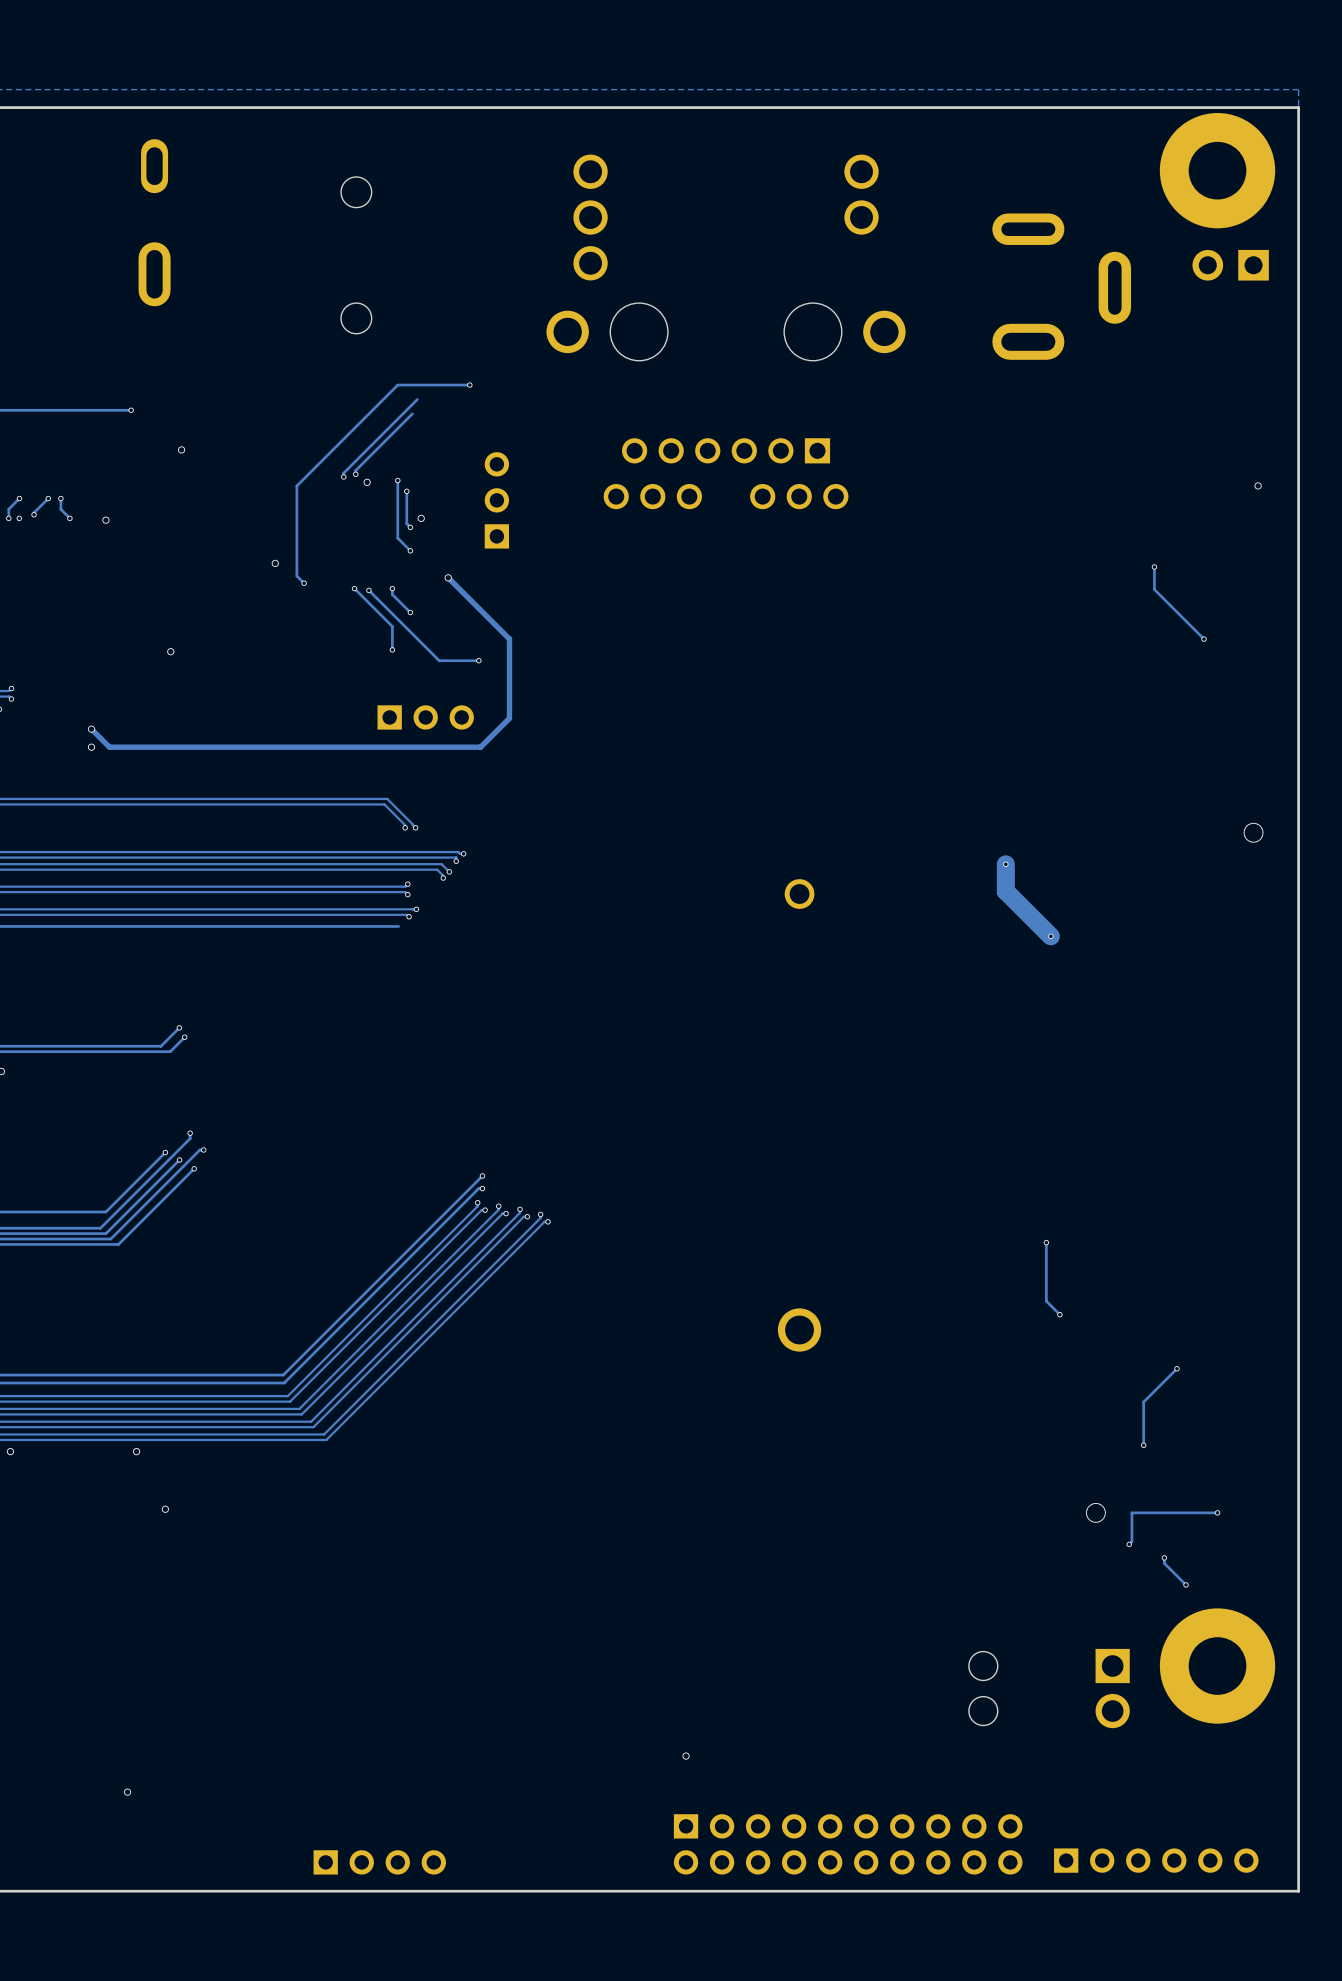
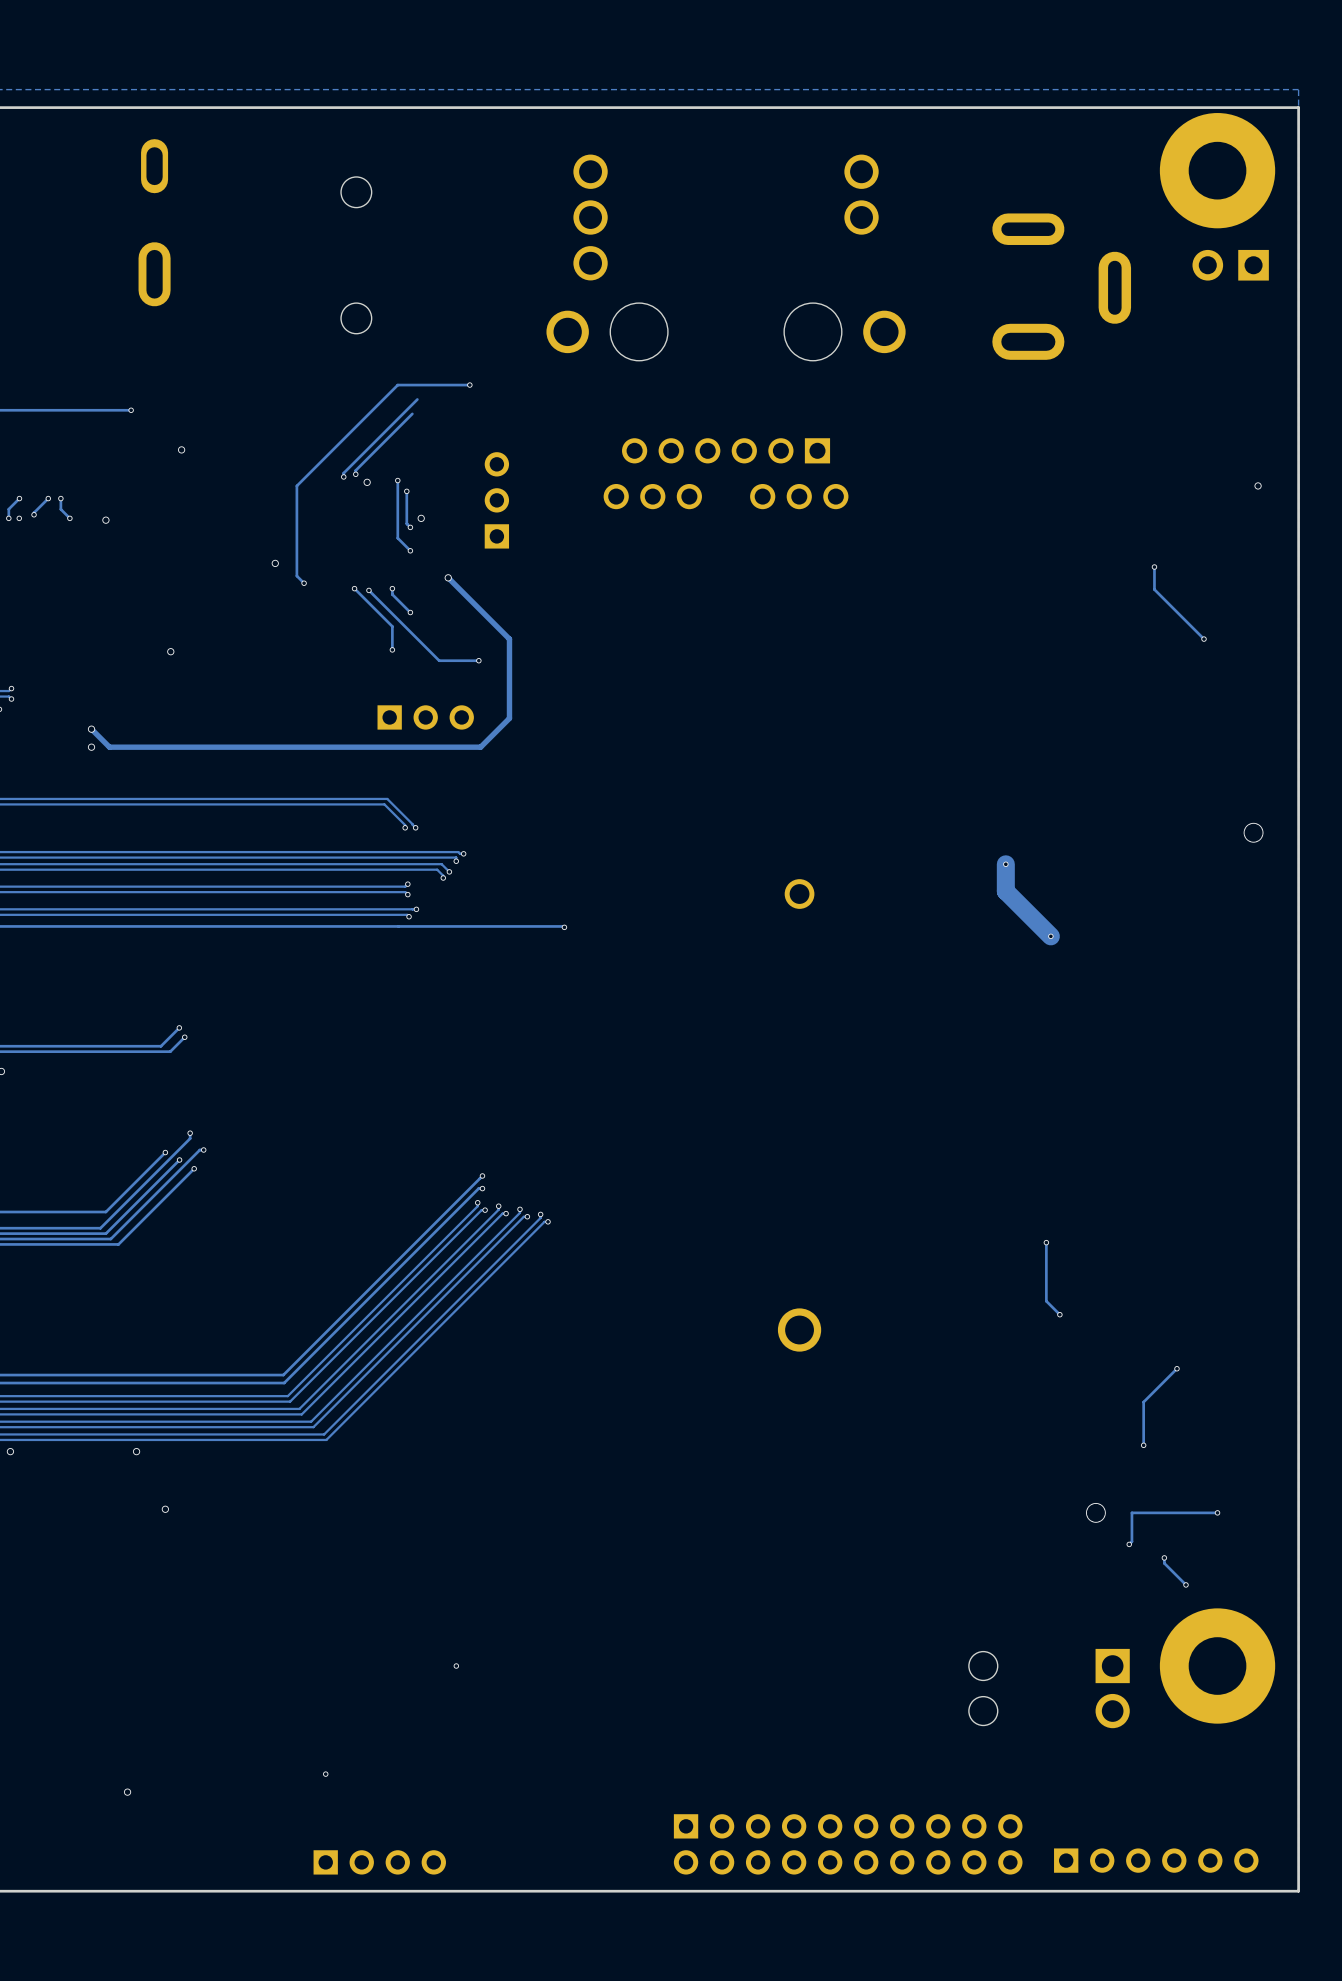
track: none -> (398, 926) (564, 927)
via: none -> (564, 927)
via: none -> (456, 1666)
via: (686, 1756) -> none
via: none -> (325, 1774)

